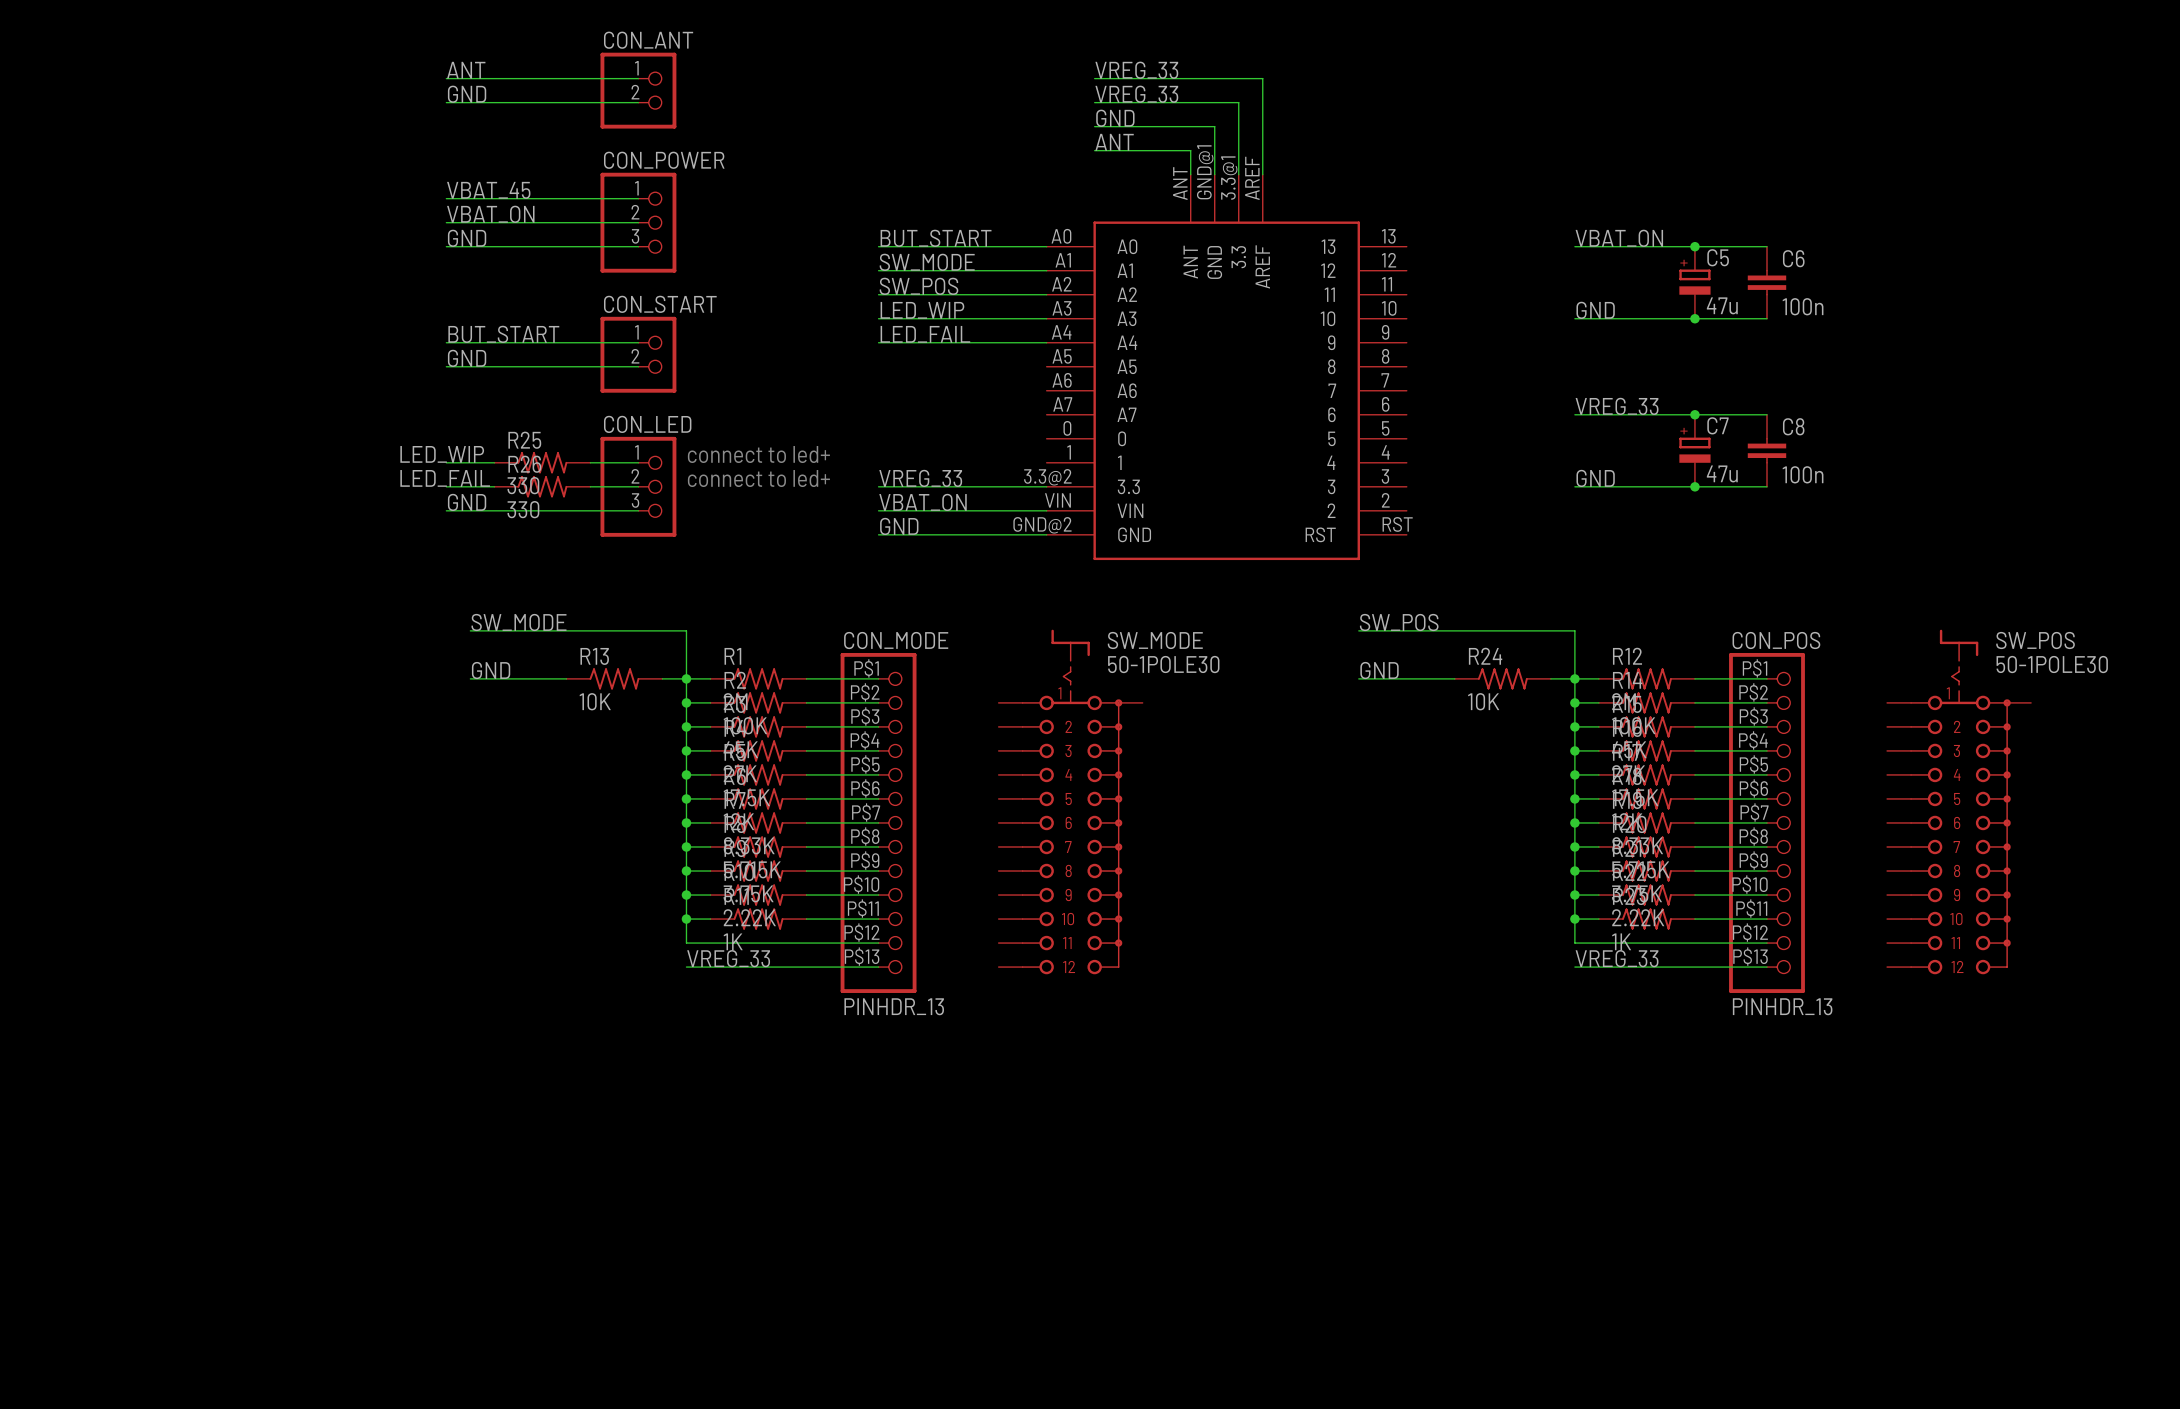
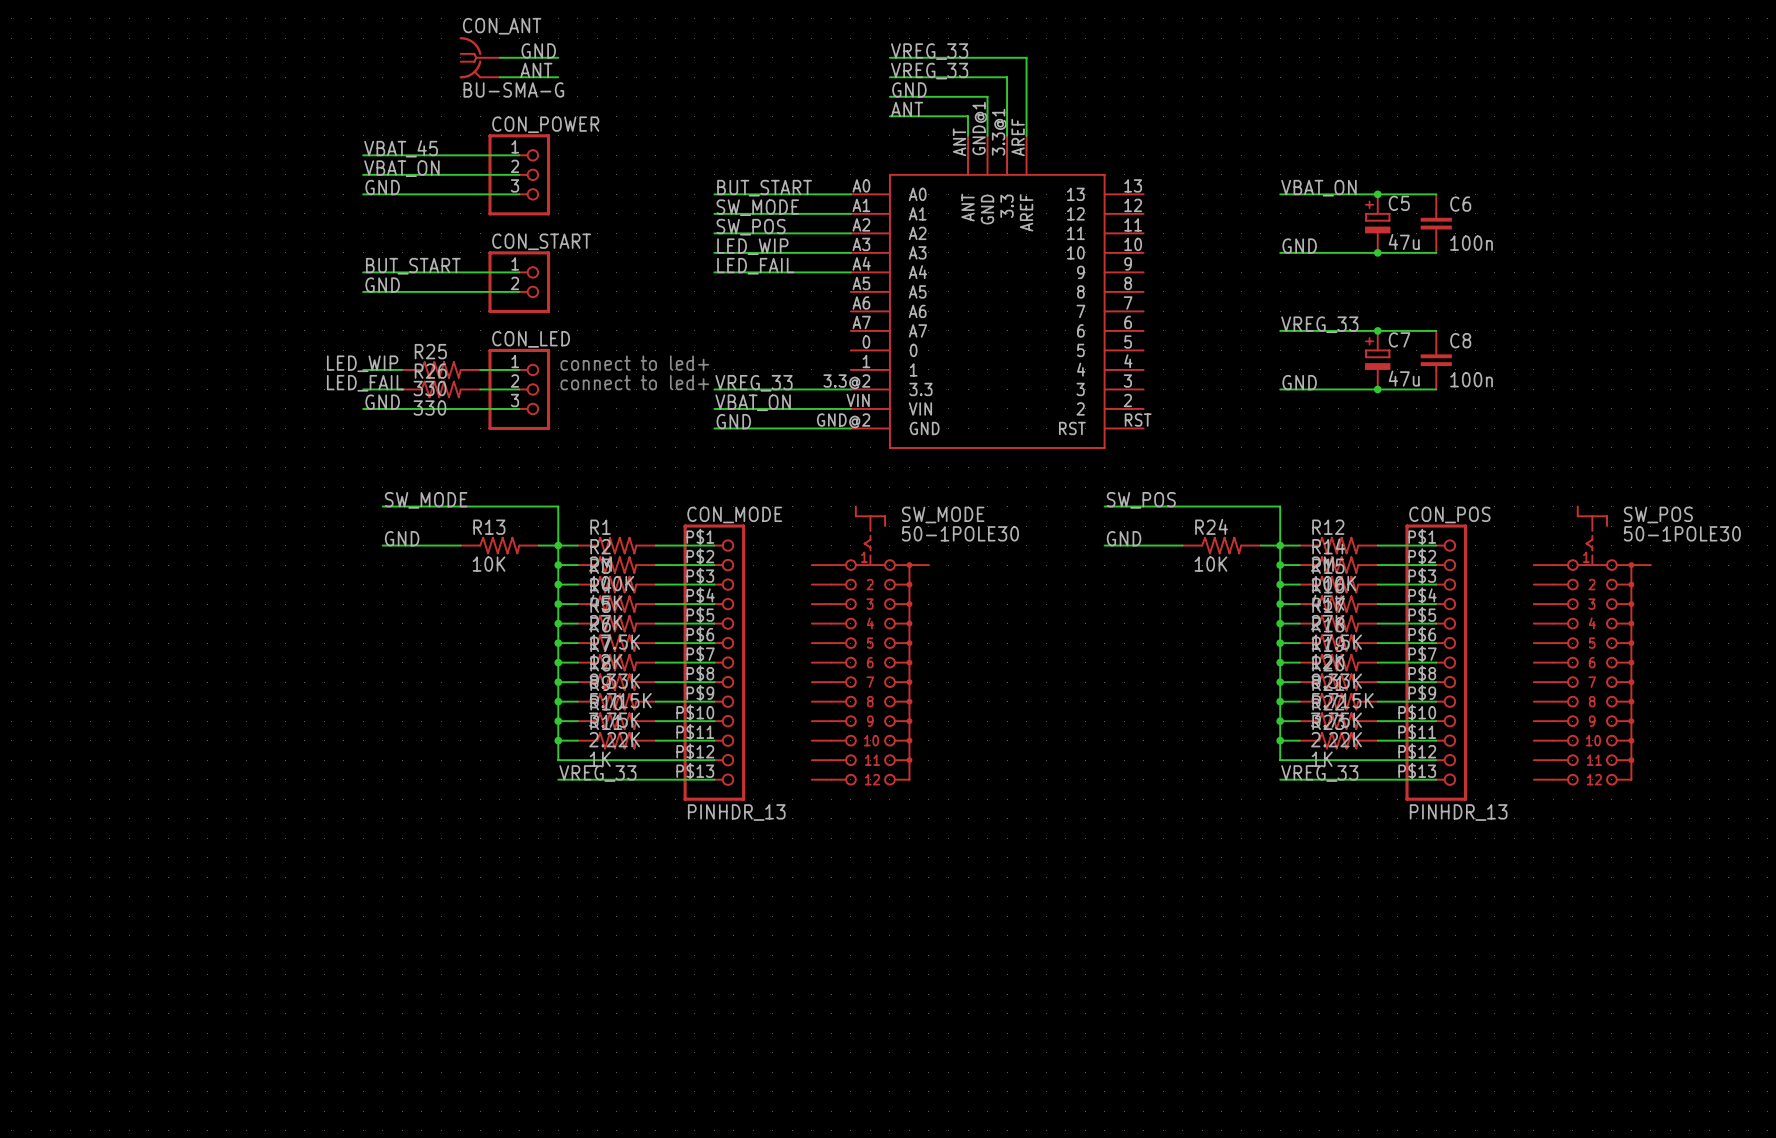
label position: ANT (466, 70) -> ANT (536, 70)
wire: (446, 78) (614, 78) -> none
CON_ANT: none -> BU-SMA-G (479, 57)
wire: none -> (519, 57) (558, 57)
CON_ANT: (638, 90) -> none
label position: GND (467, 94) -> GND (538, 50)
wire: (446, 102) (614, 102) -> none
wire: none -> (519, 77) (558, 77)

